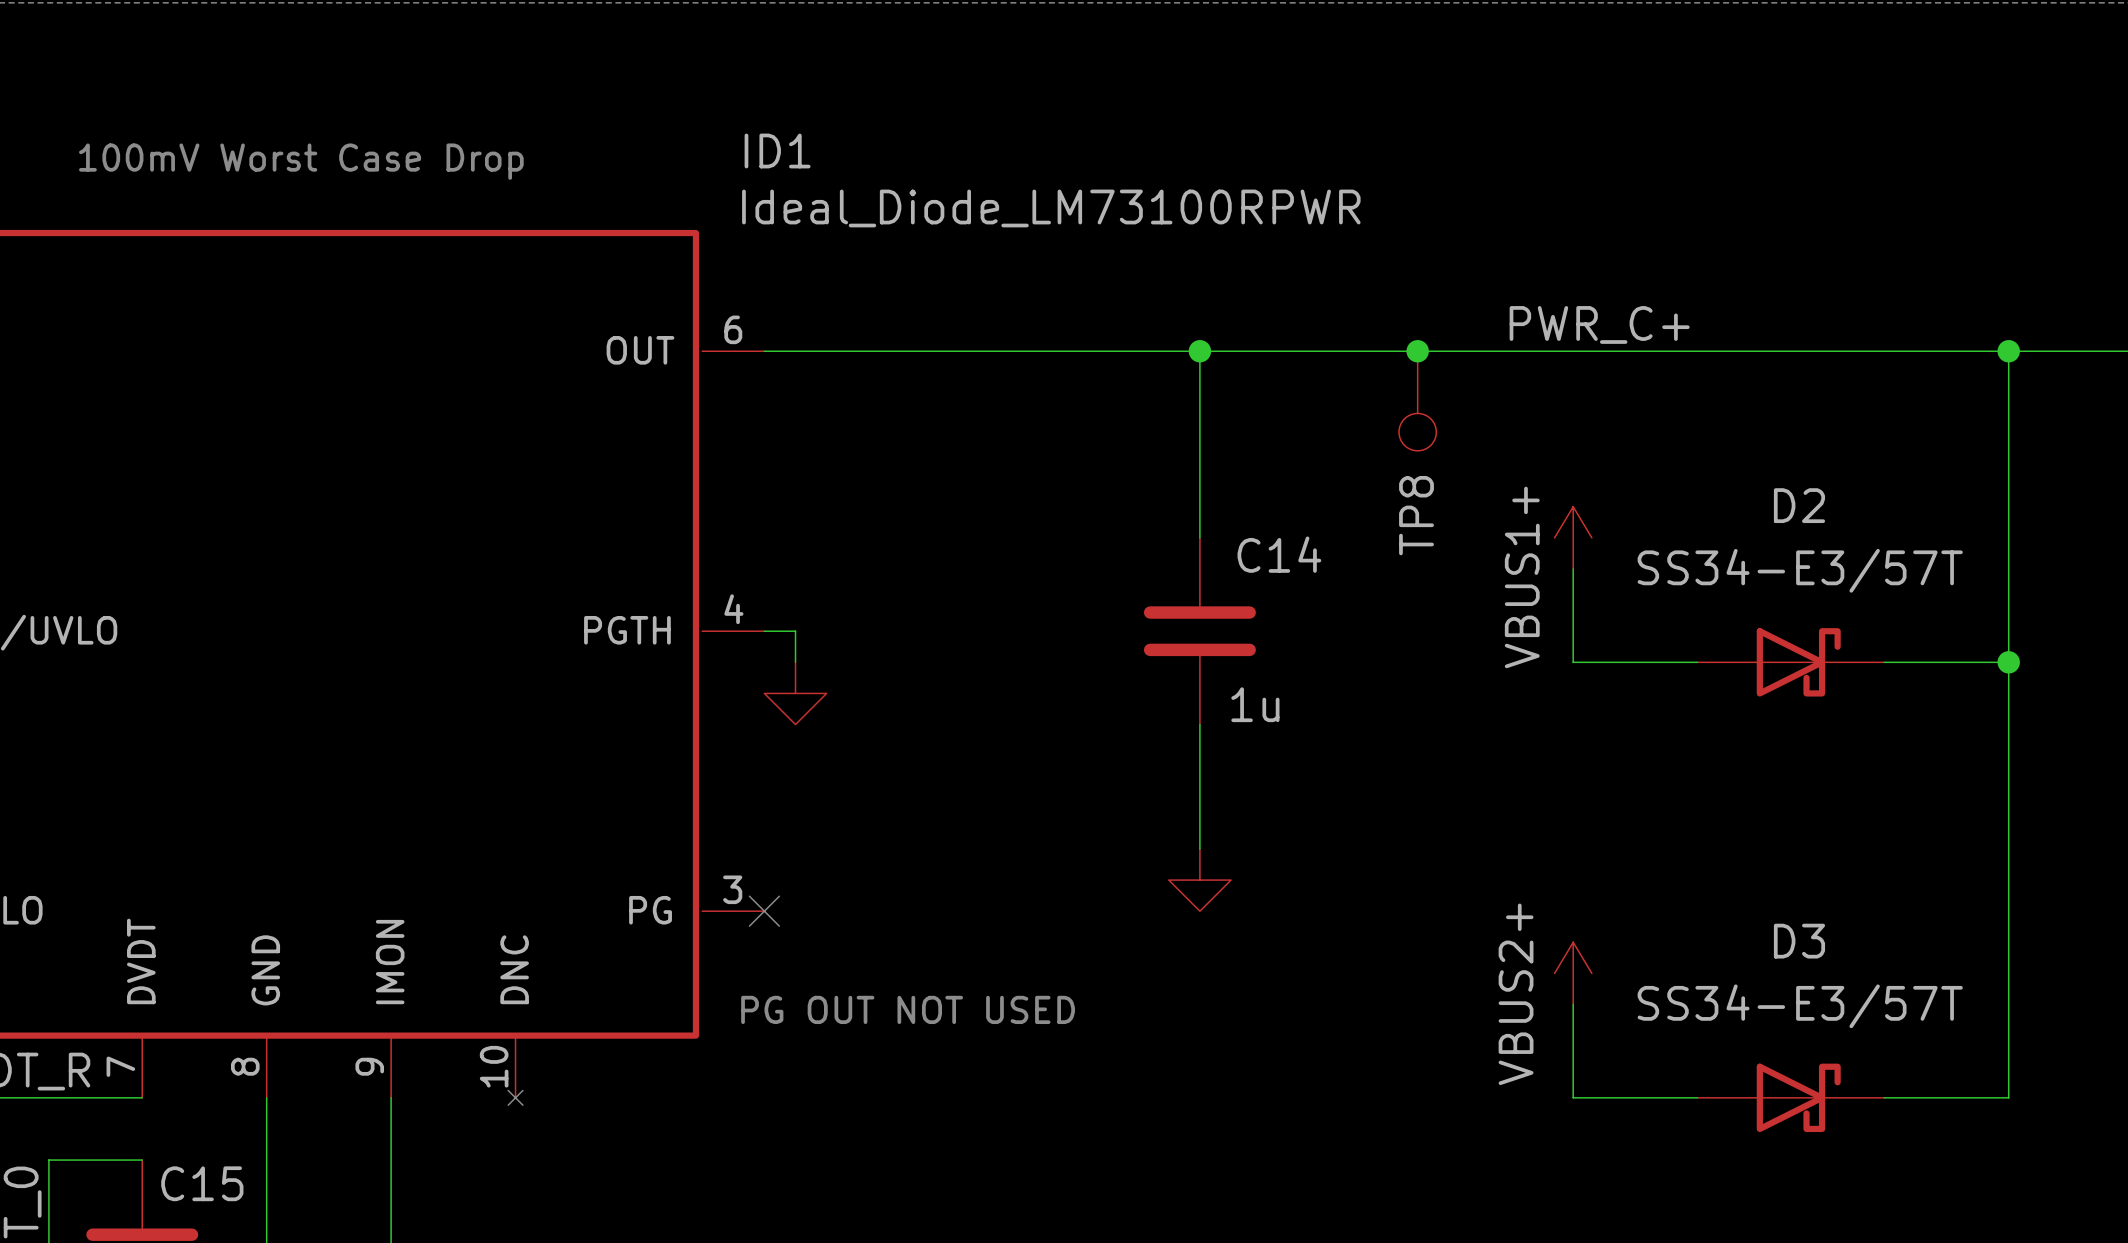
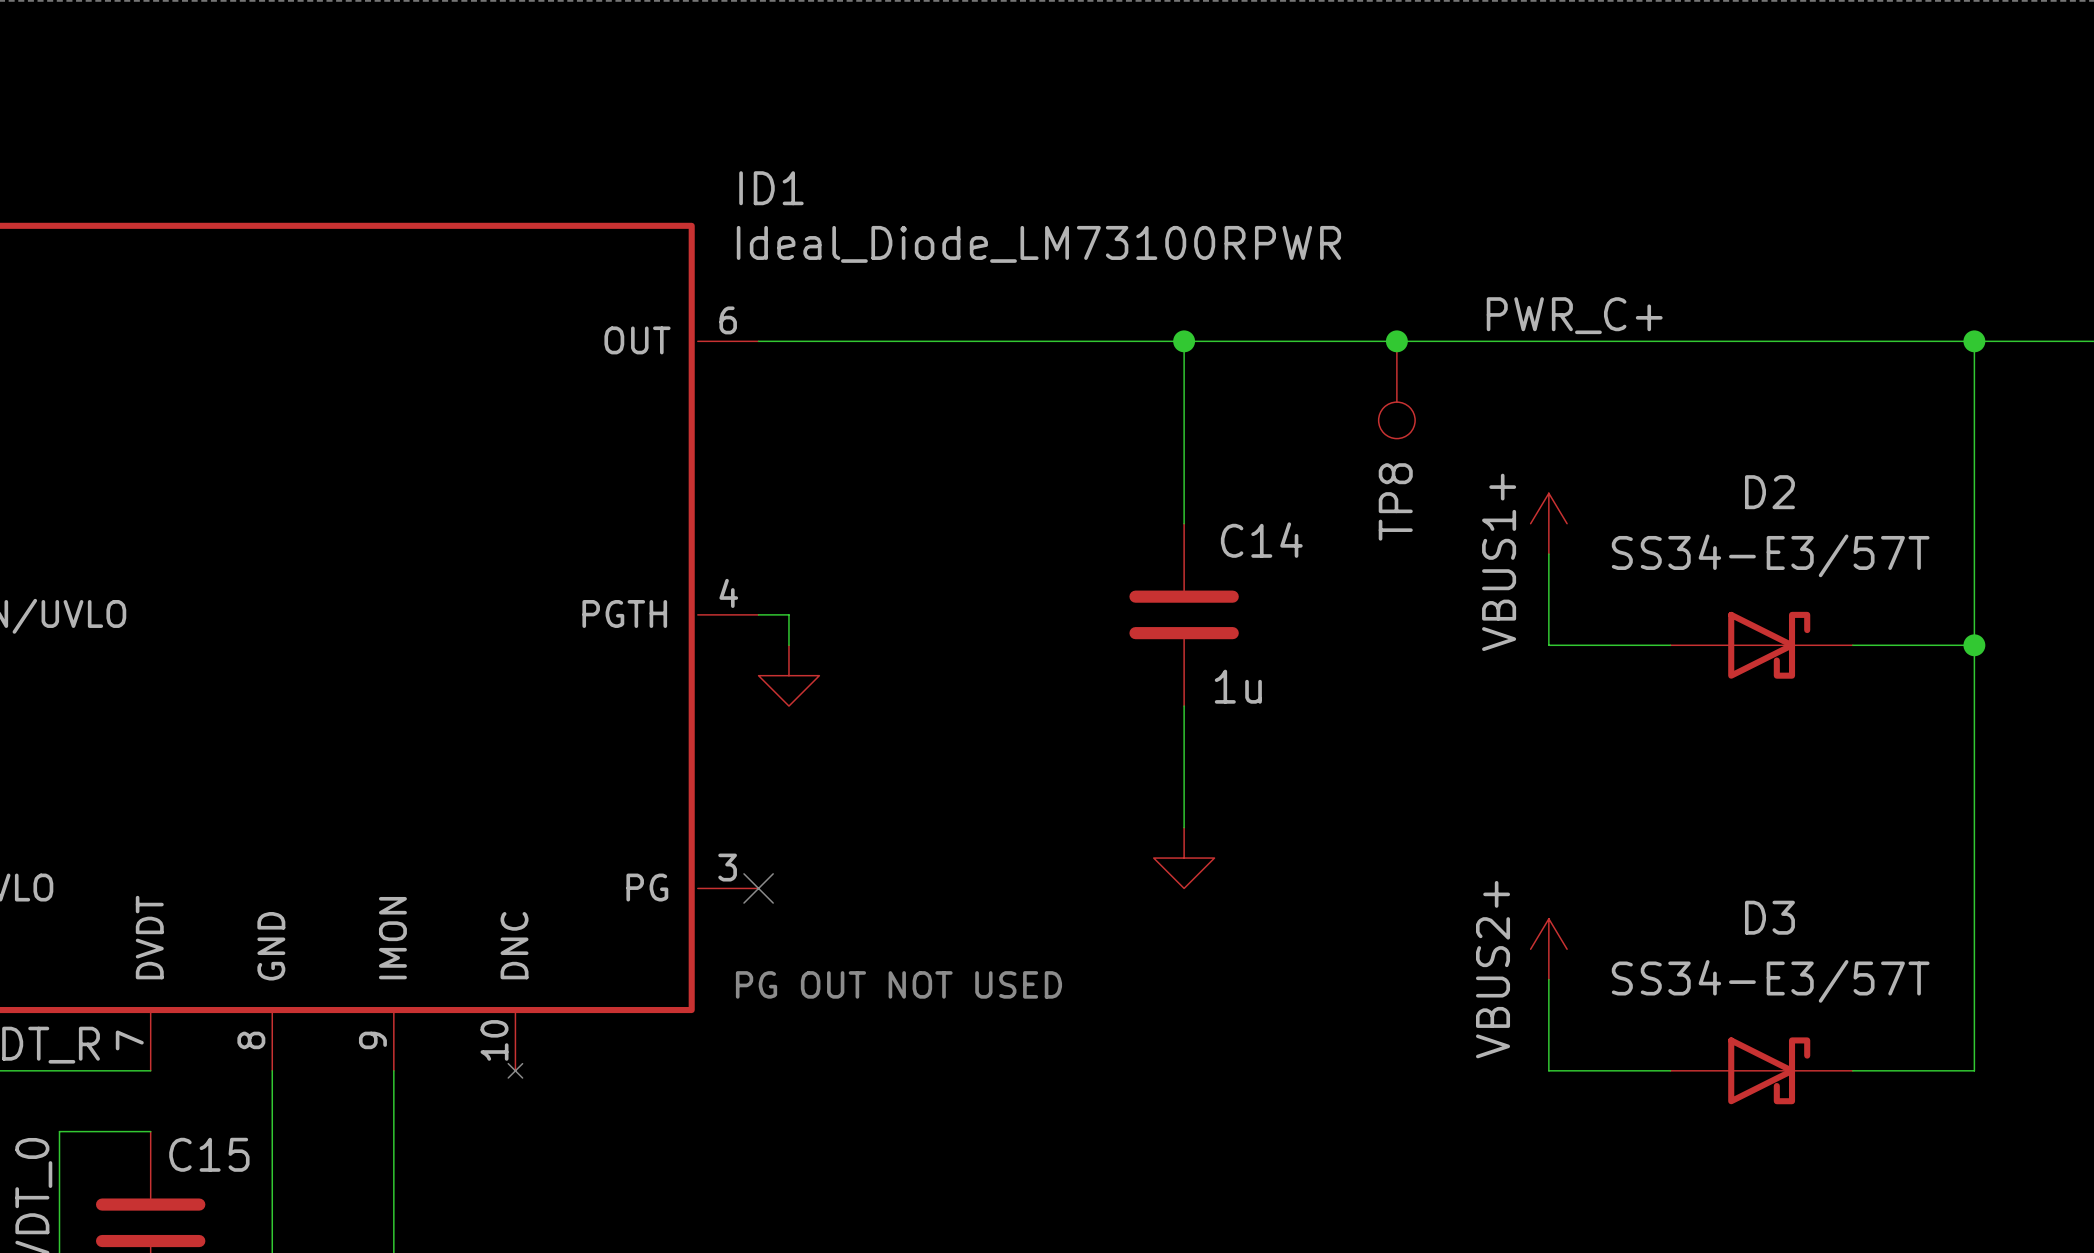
ID1 name position: ID1 (777, 151) -> ID1 (771, 188)
text: 100mV Worst Case Drop (301, 161) -> none
ID1 value position: Ideal_Diode_LM73100RPWR (1051, 208) -> Ideal_Diode_LM73100RPWR (1038, 244)

